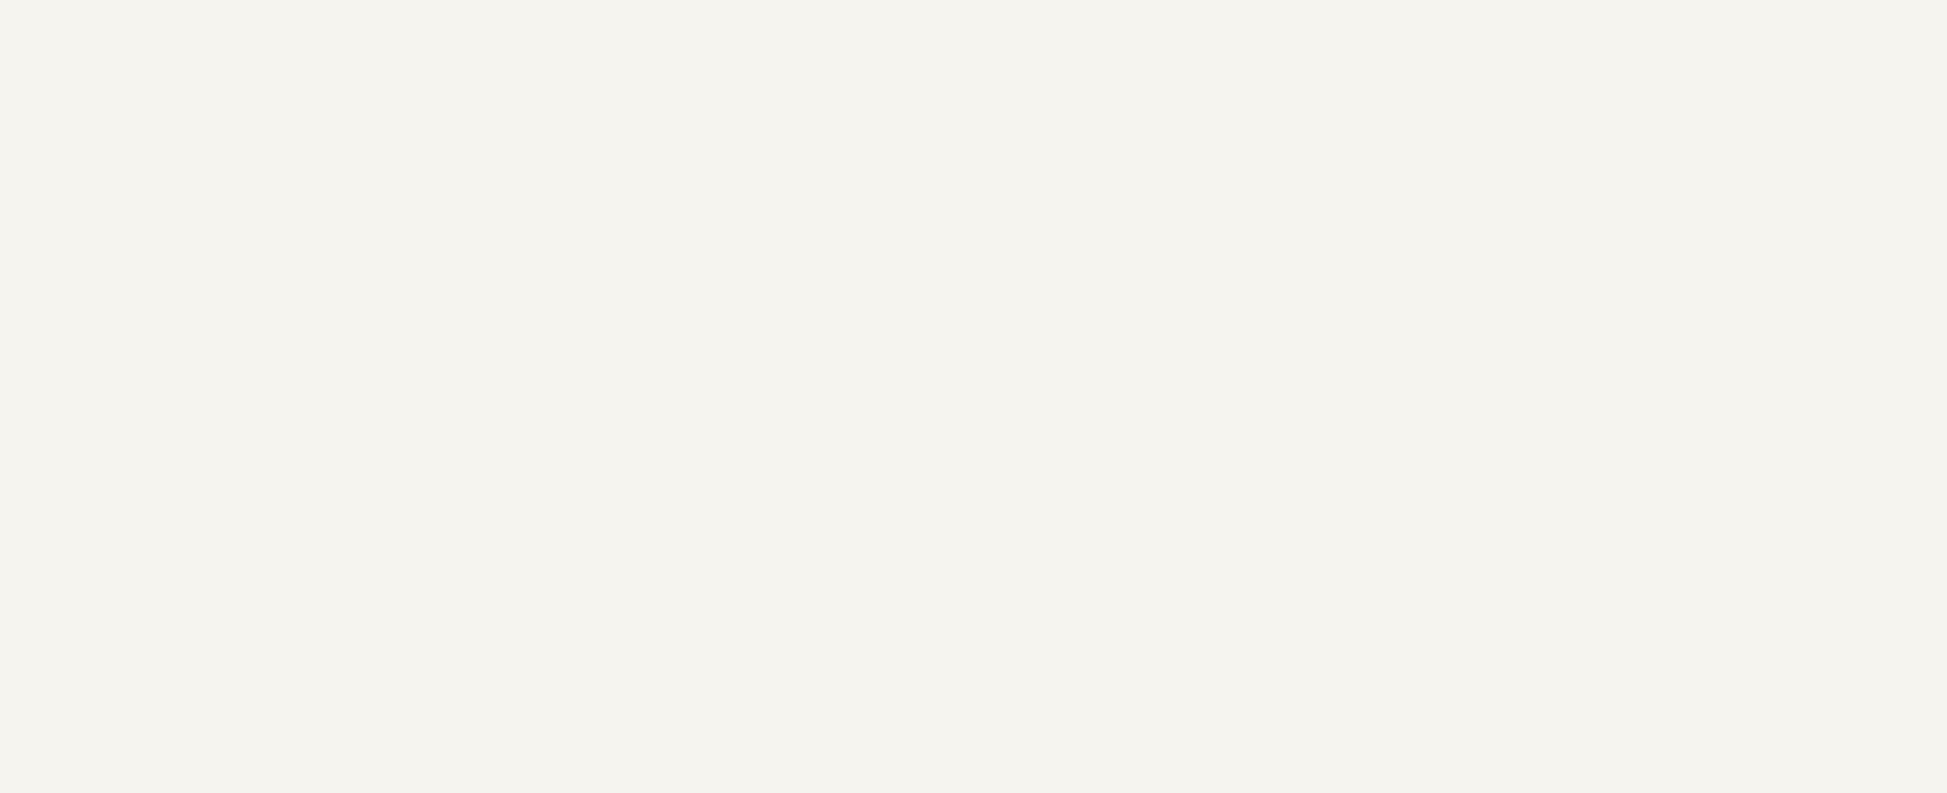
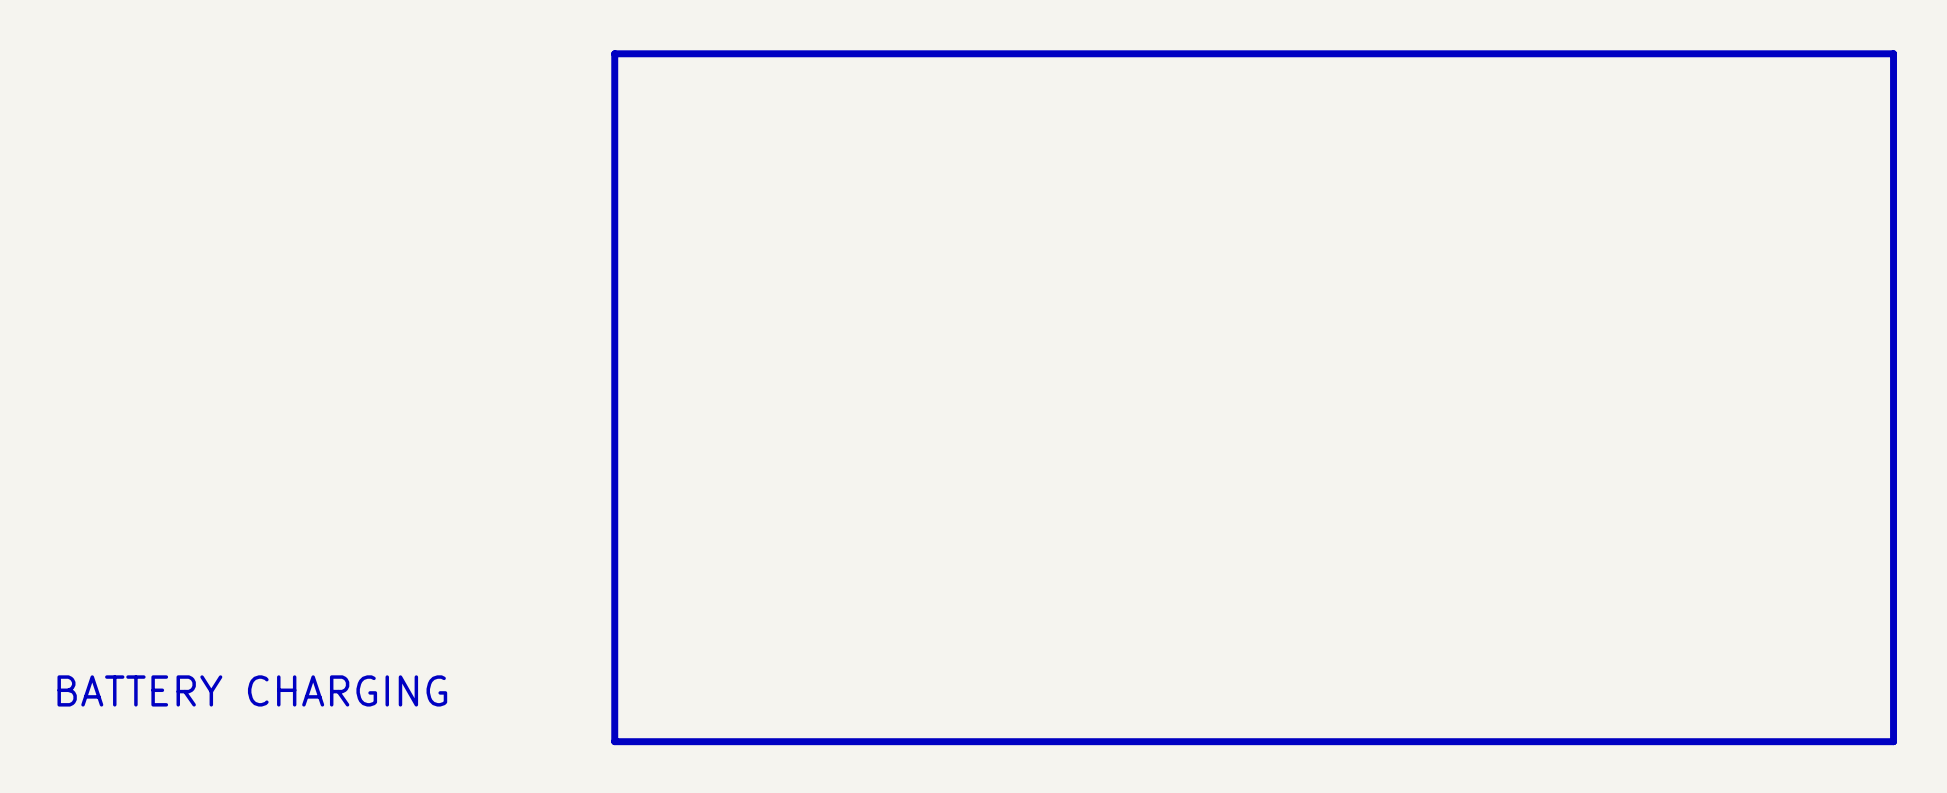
line: none -> (614, 53) (1893, 53) (1893, 741) (614, 741) (614, 53)
text: none -> BATTERY CHARGING (252, 690)

